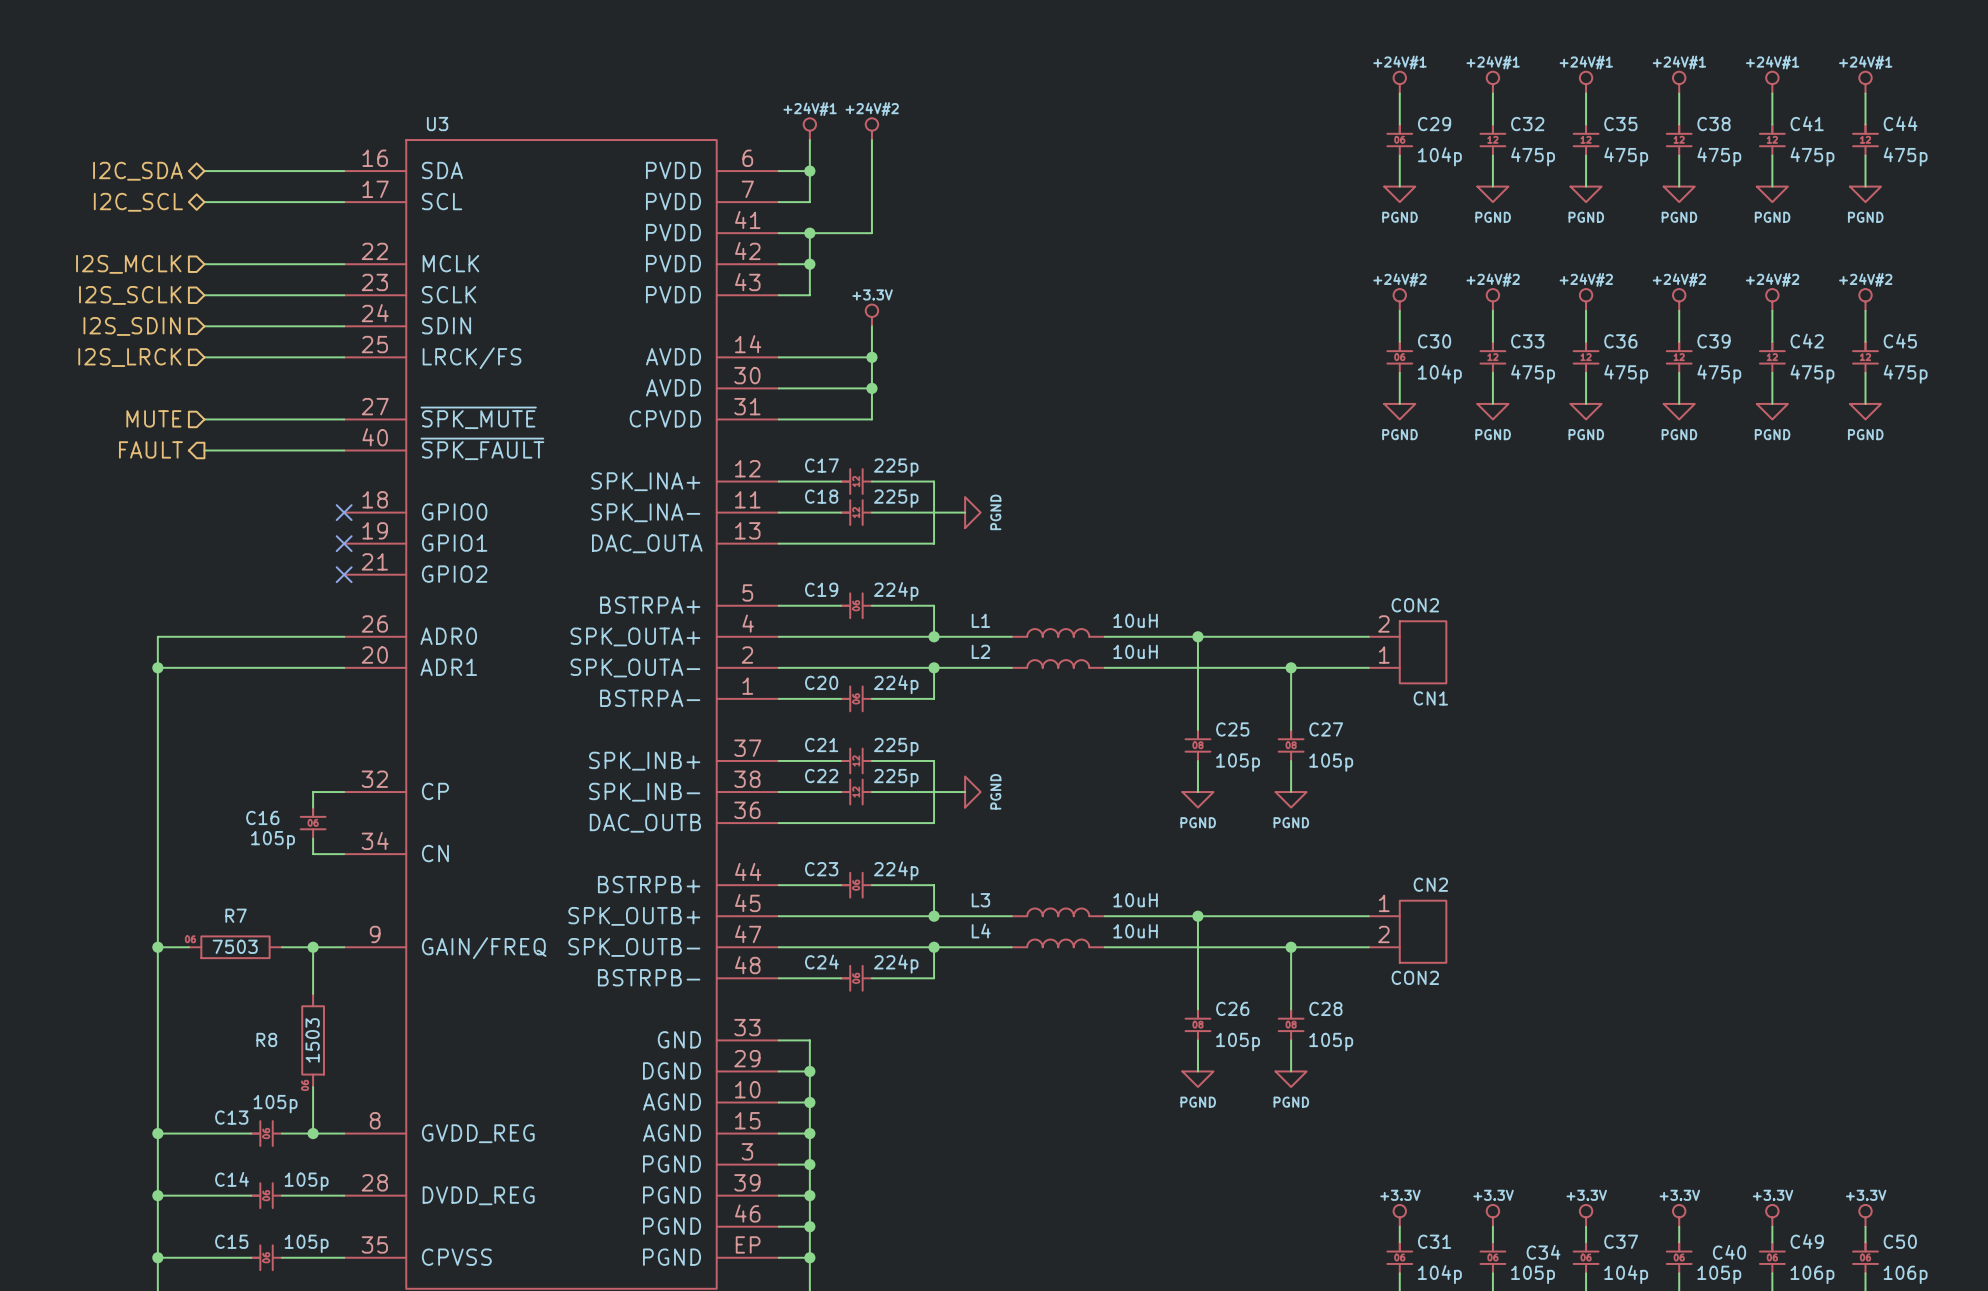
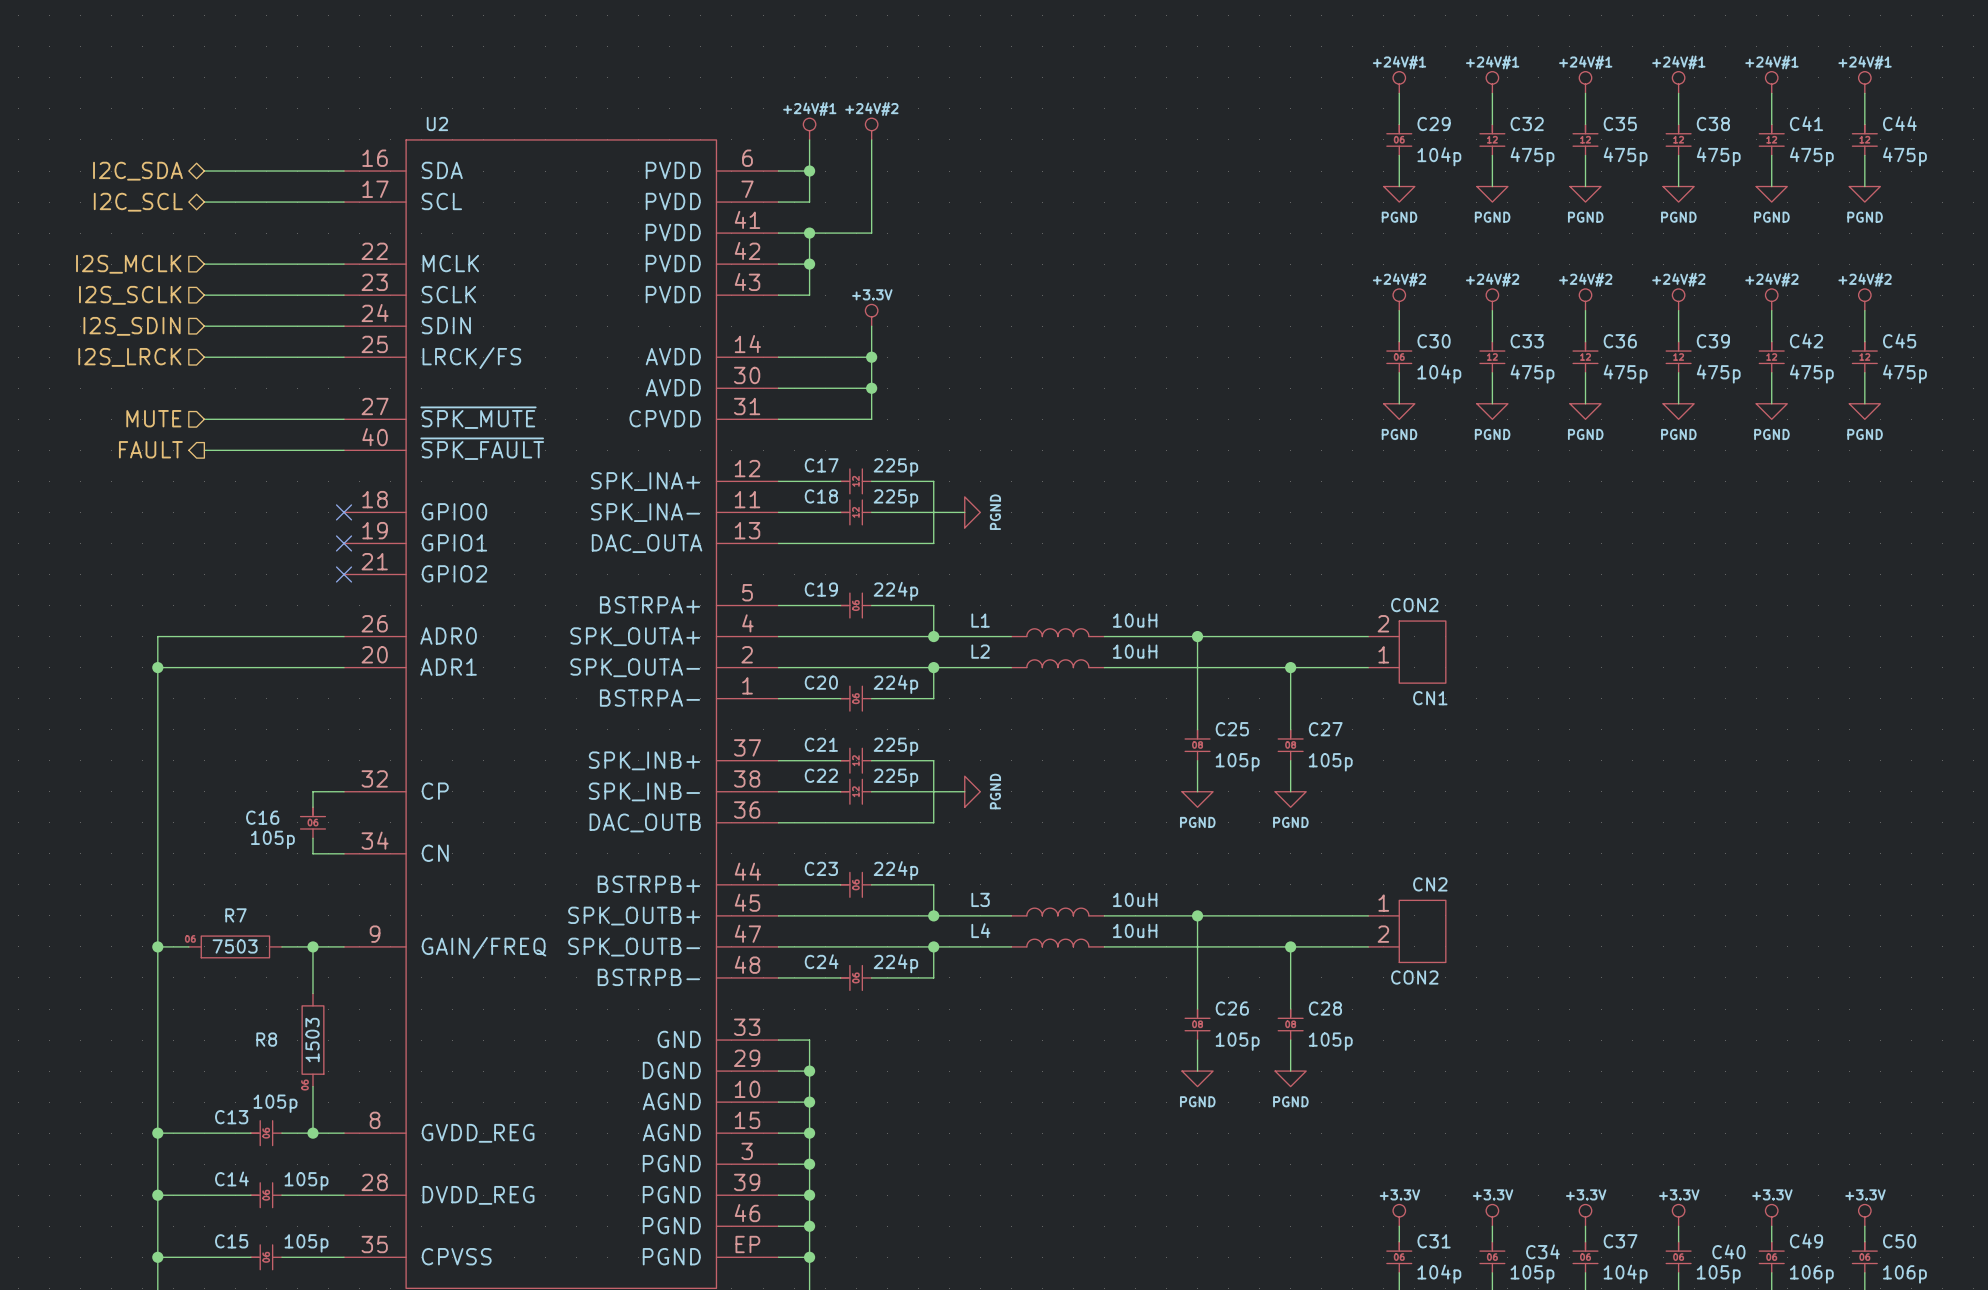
U3 name: U3 (437, 124) -> U2 (437, 123)

